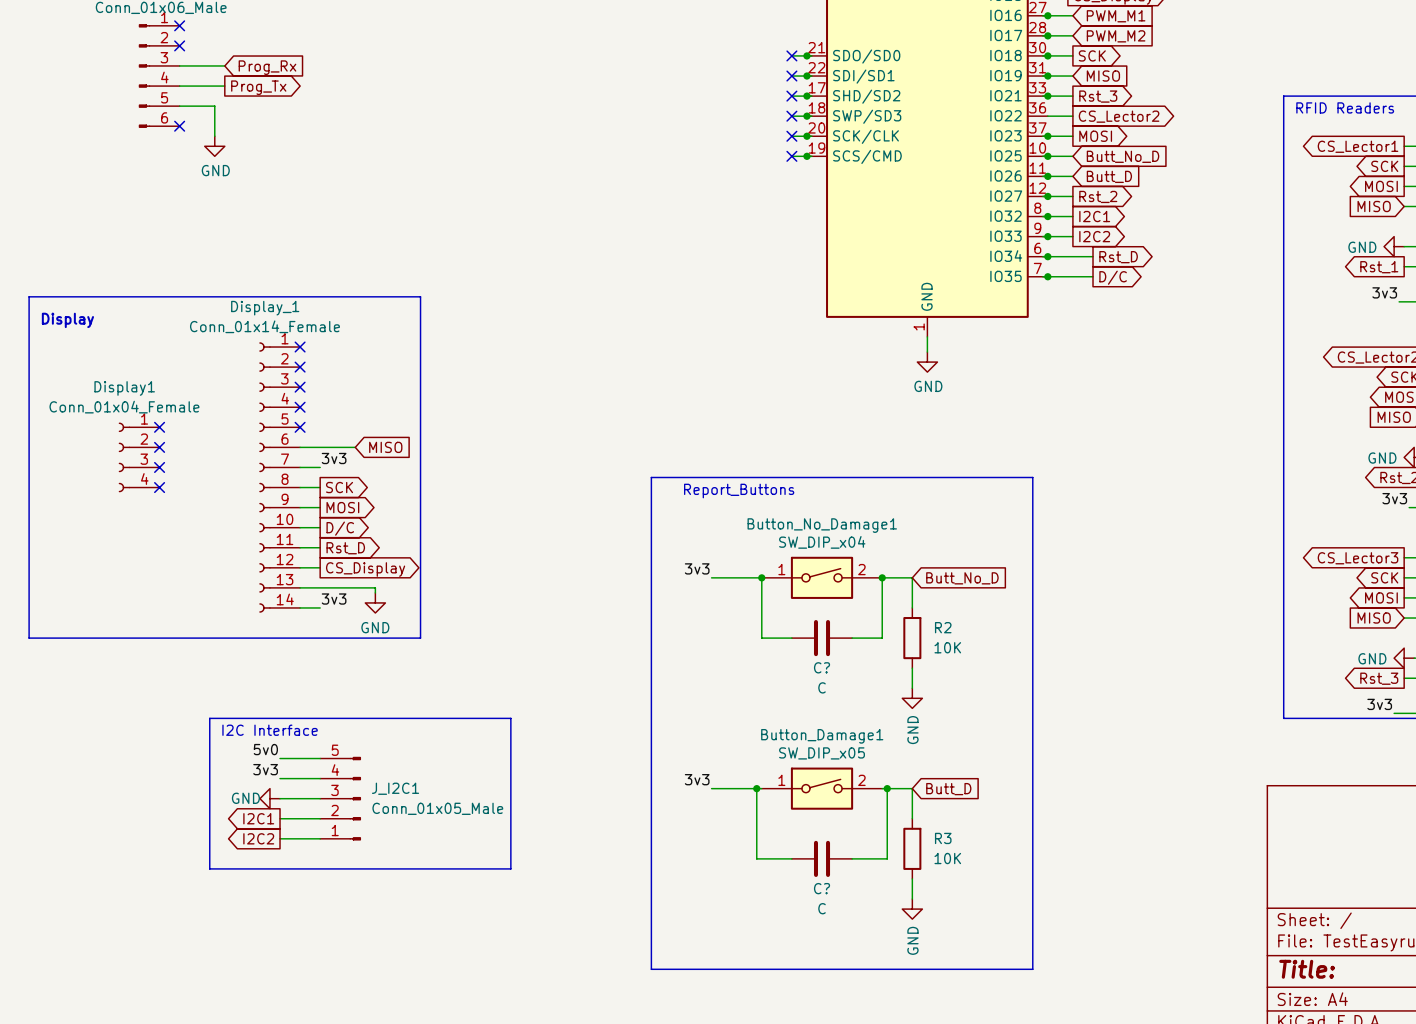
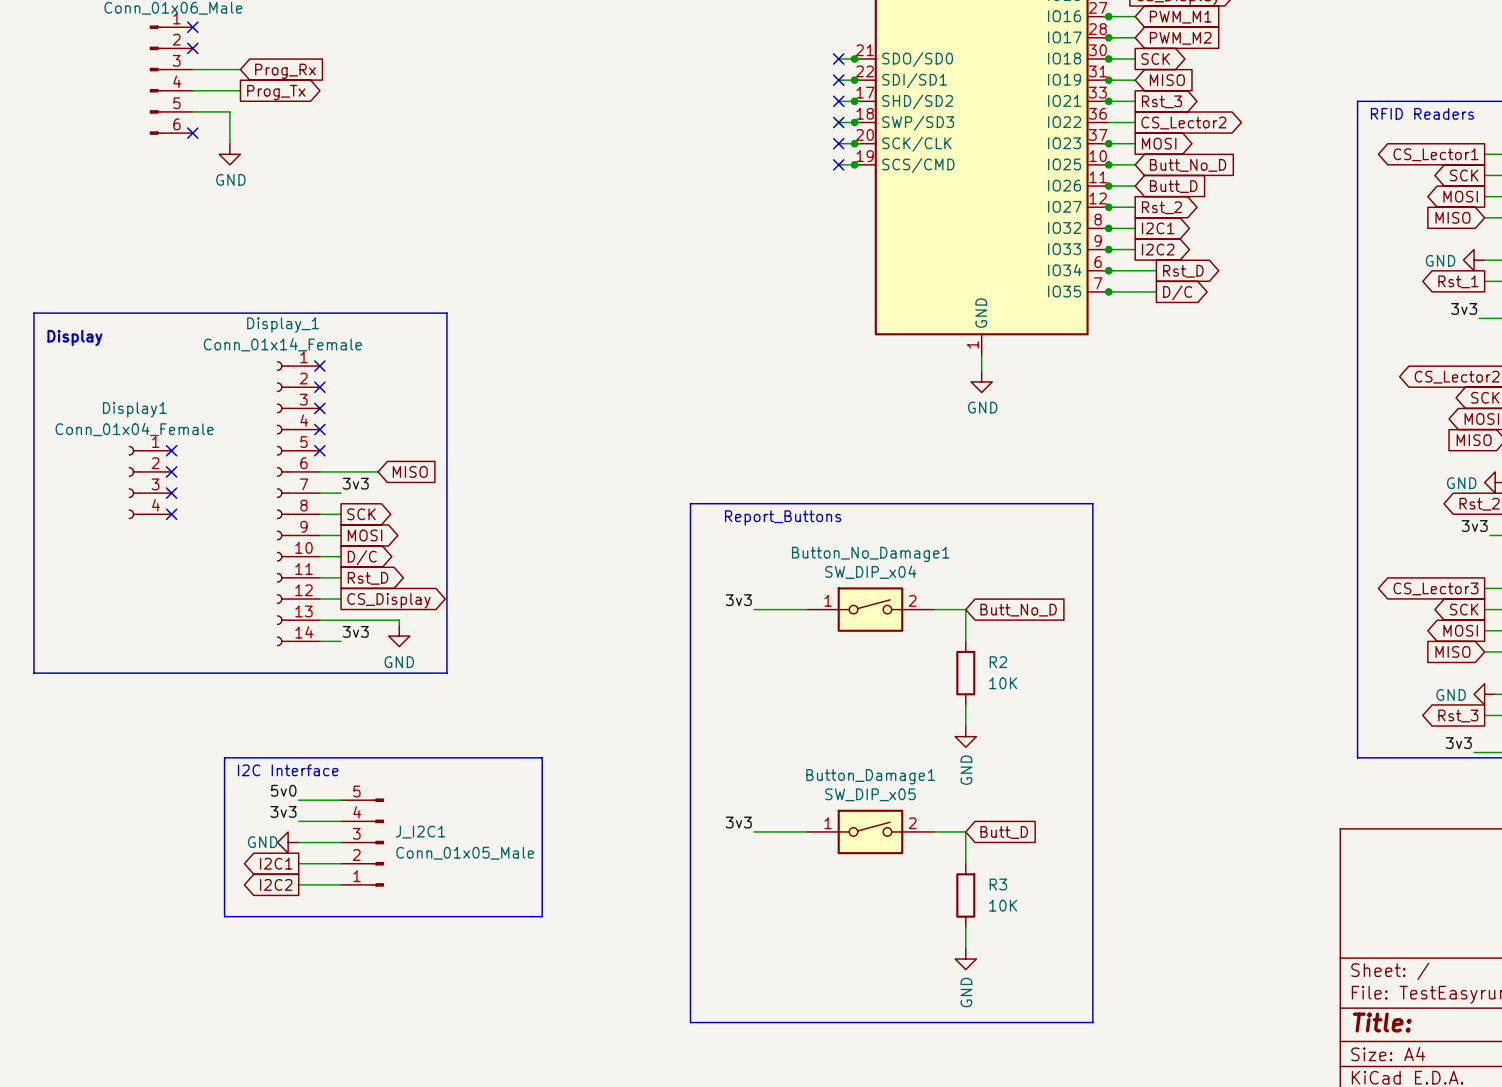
wire: (761, 577) (761, 638) (791, 638) -> none
junction: (761, 577) -> none
wire: (882, 577) (882, 638) (852, 638) -> none
junction: (882, 577) -> none
C?: C (822, 638) -> none
wire: (756, 788) (756, 858) (791, 858) -> none
junction: (756, 788) -> none
wire: (887, 788) (887, 858) (852, 858) -> none
junction: (887, 788) -> none
C?: C (822, 858) -> none

